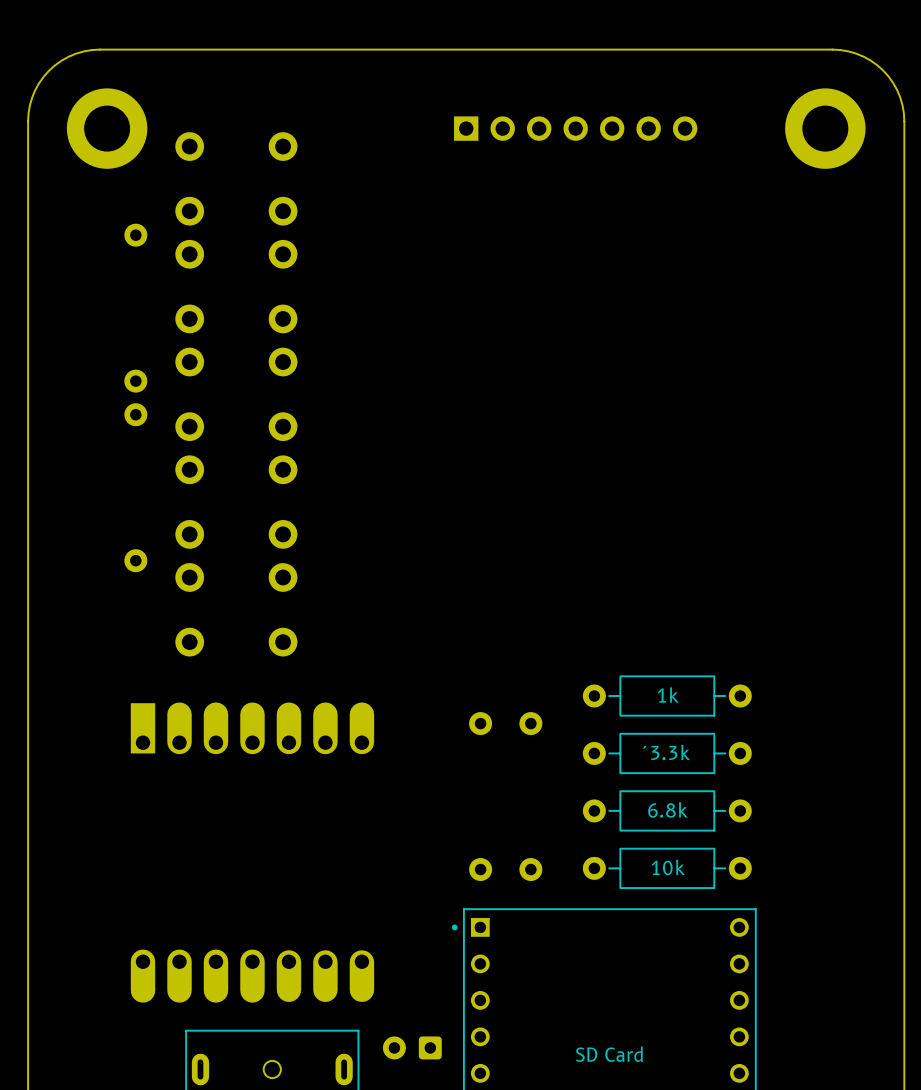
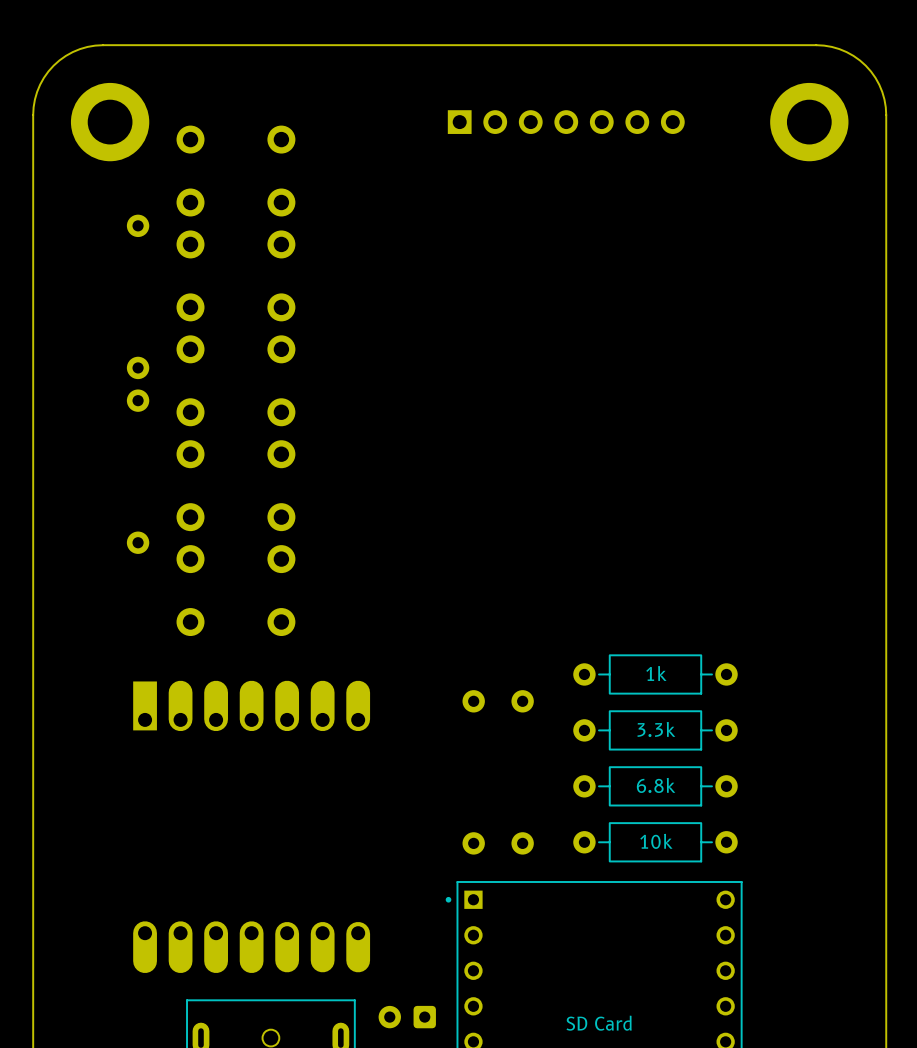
´3.3k name: ´3.3k (666, 752) -> 3.3k (656, 729)

